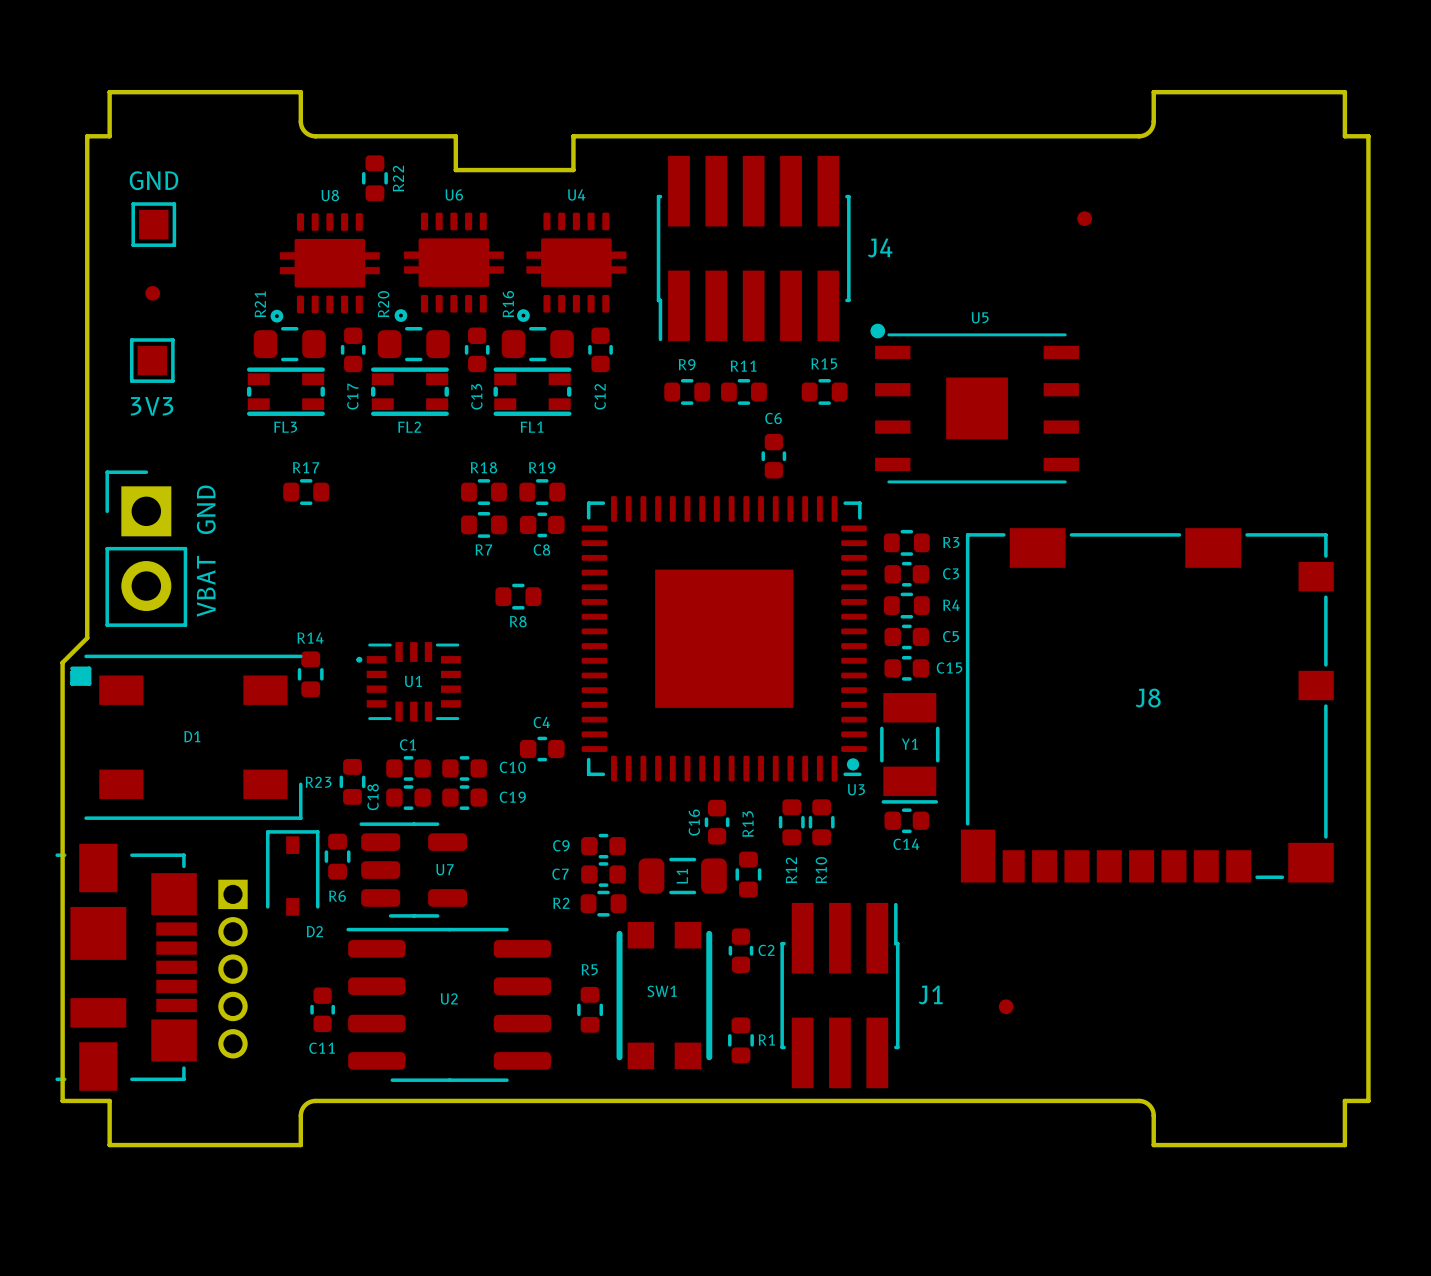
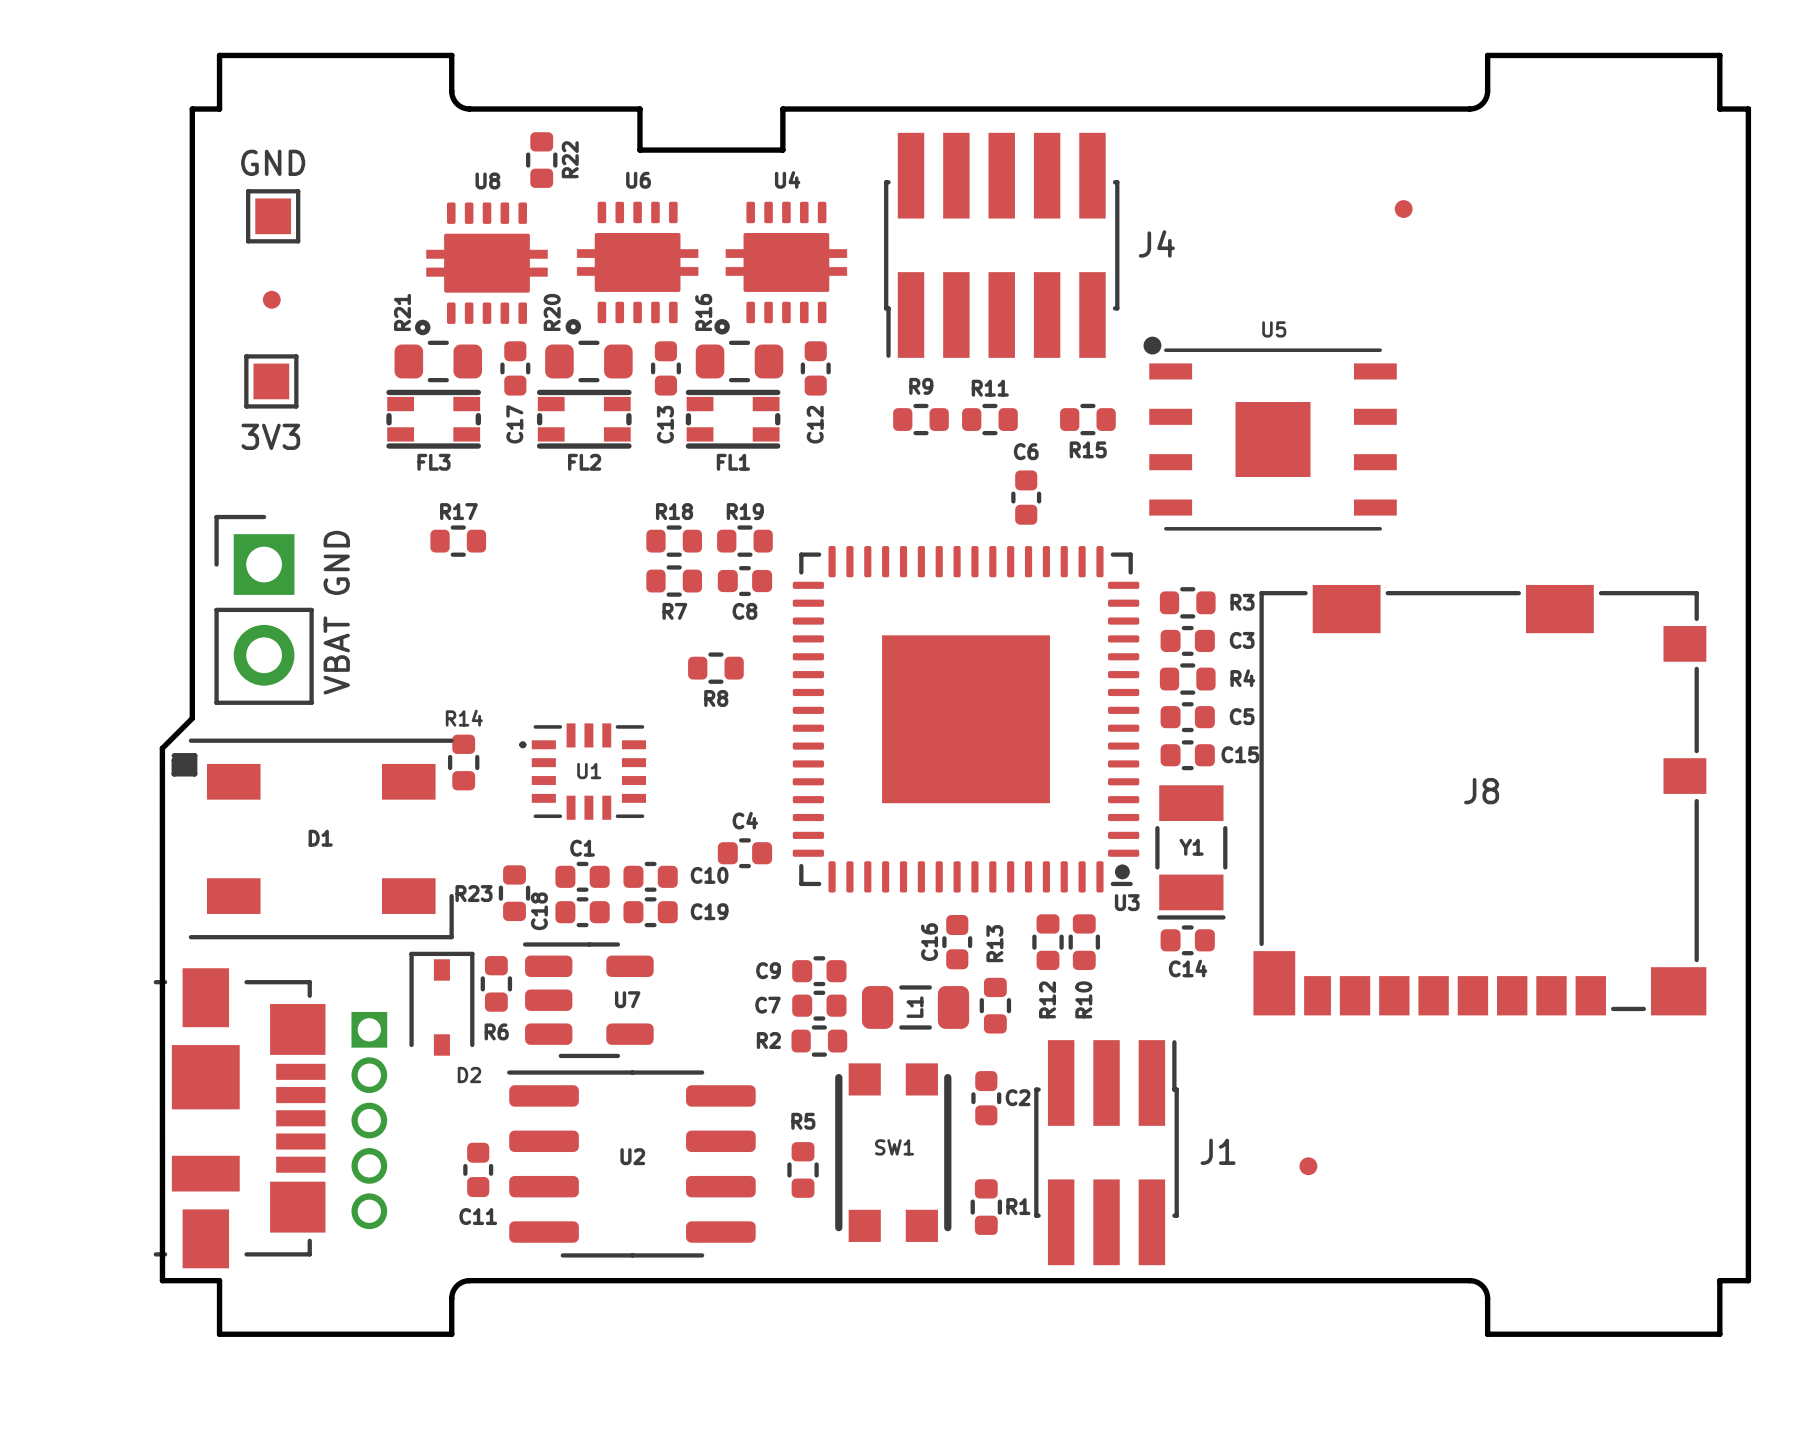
R15 name position: R15 (824, 363) -> R15 (1088, 449)

